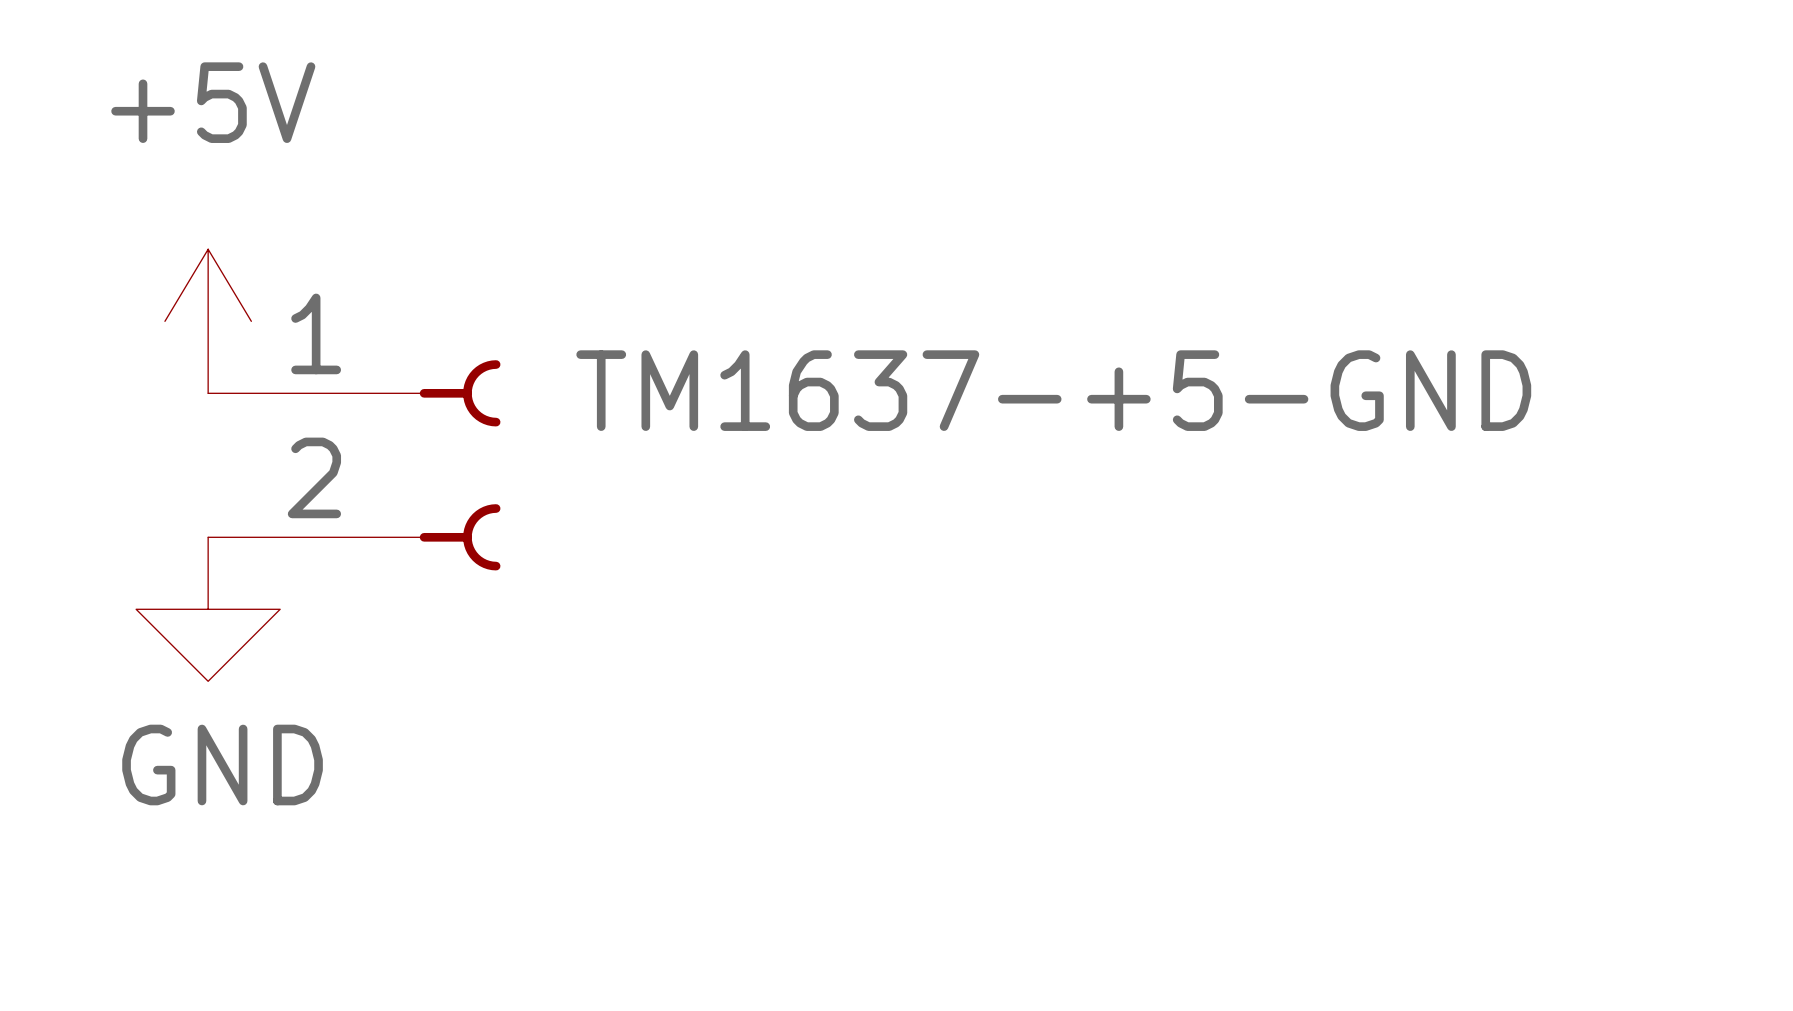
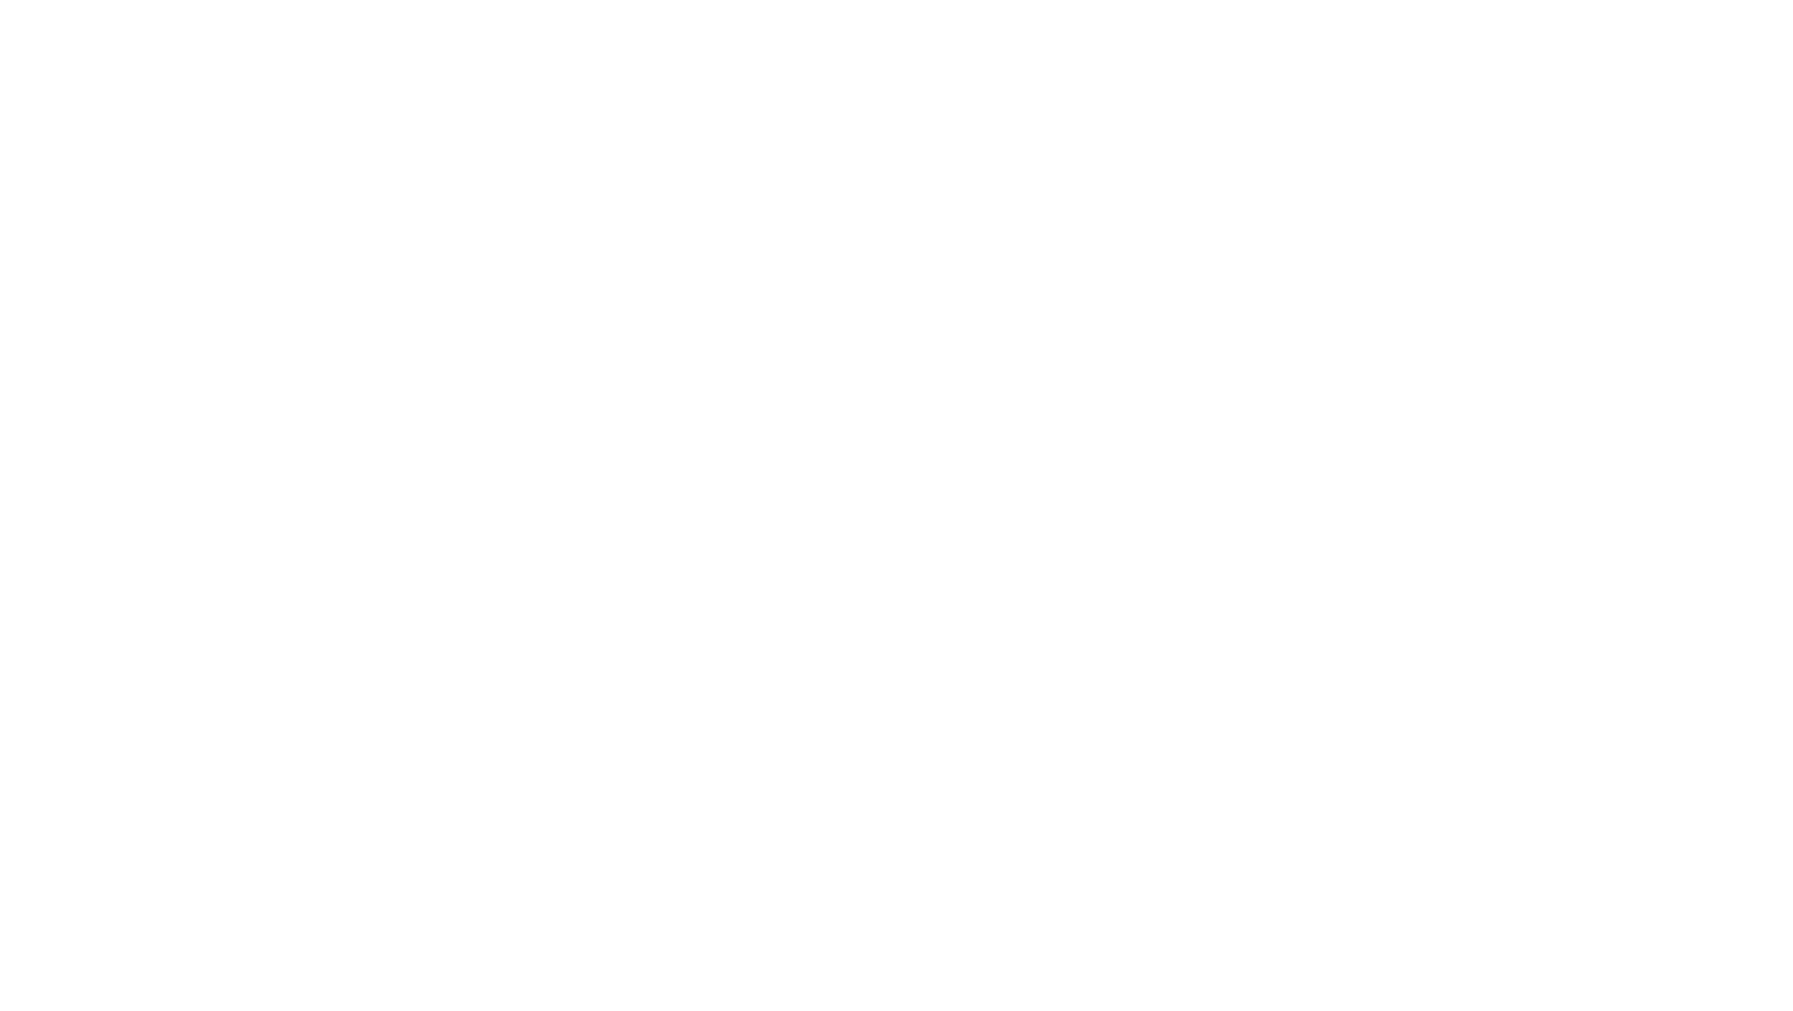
power symbol: +5V (208, 321) -> none
TM1637-+5-GND: (354, 465) -> none
power symbol: GND (208, 609) -> none

